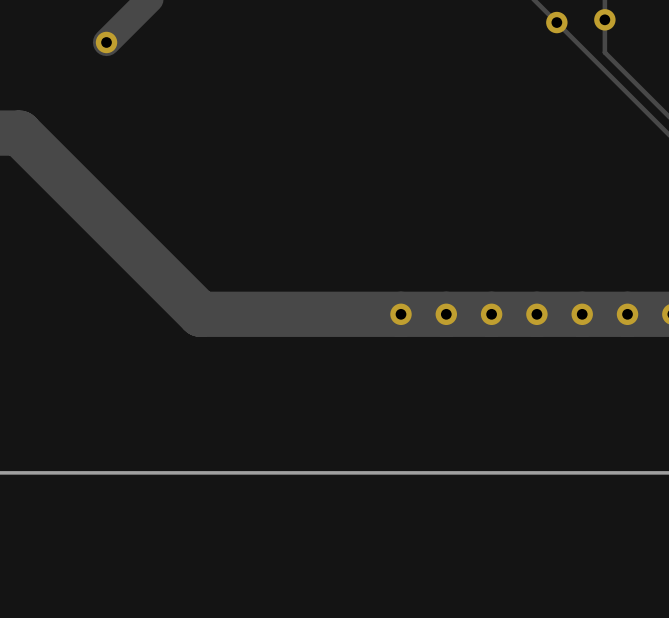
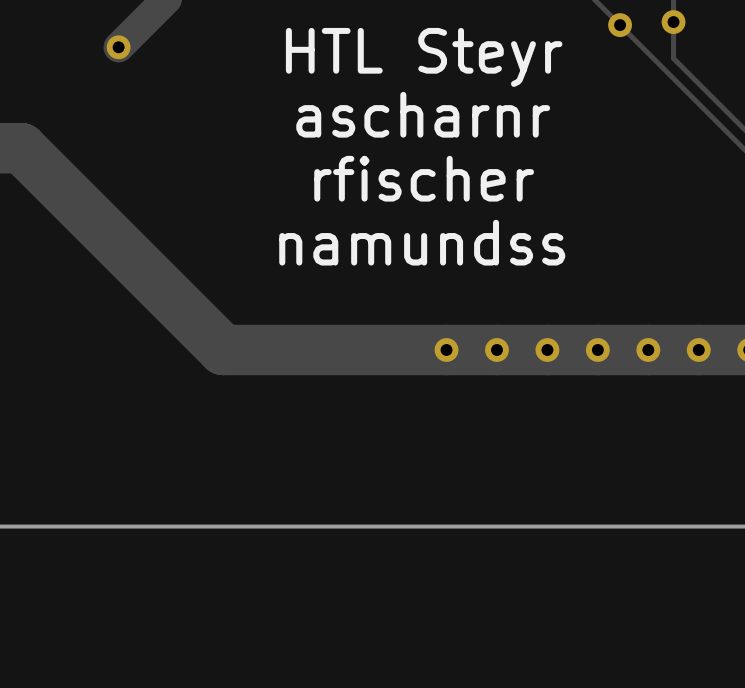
text: none -> HTL Steyr (424, 57)
text: none -> ascharnr (423, 114)
text: none -> rfischer (424, 178)
text: none -> namundss (422, 242)

